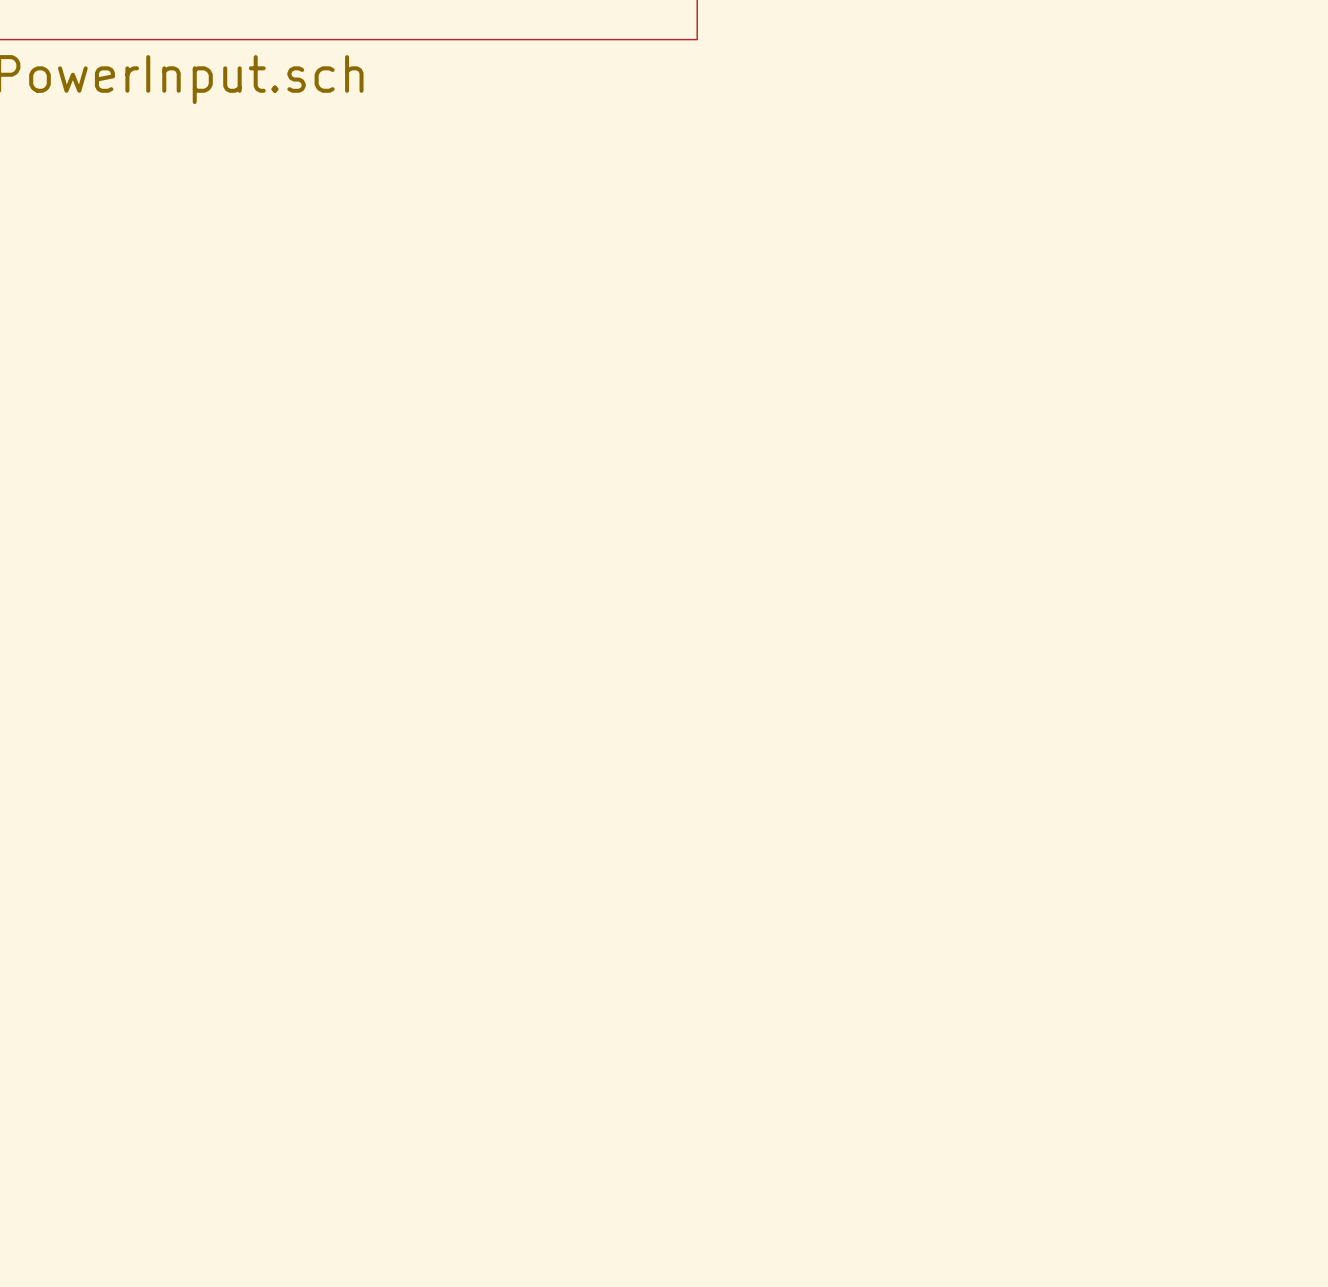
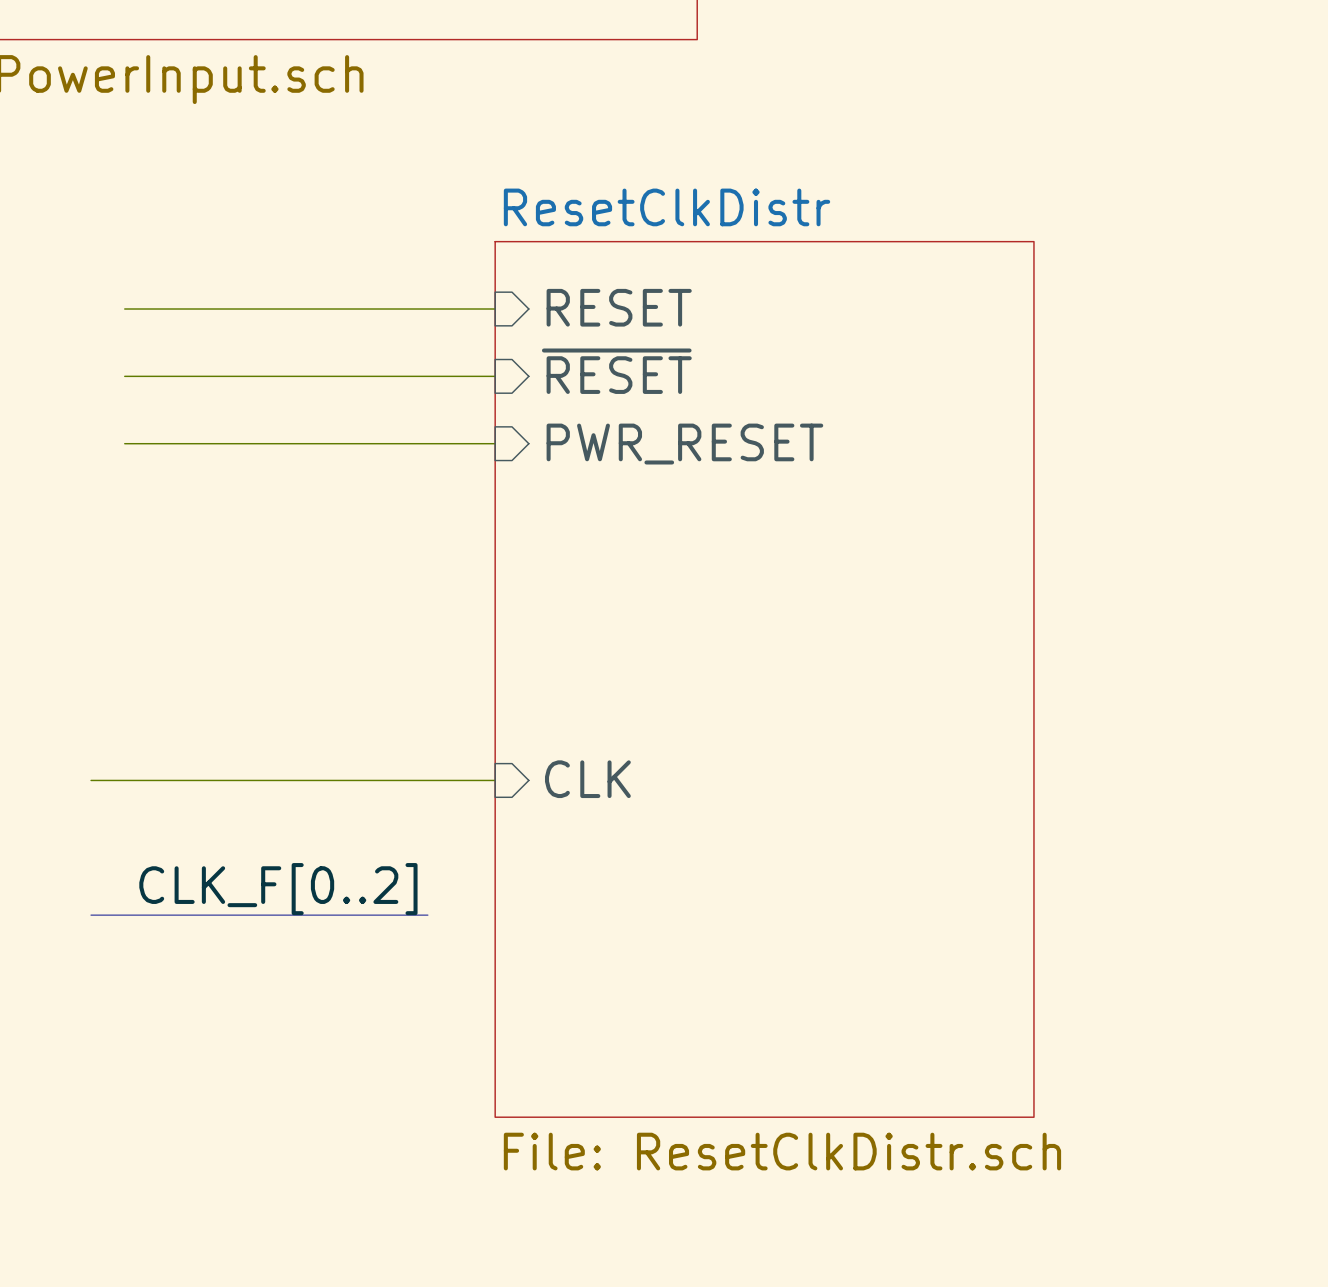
sheet pin: none -> RESET (619, 307)
wire: none -> (124, 309) (495, 309)
sheet pin: none -> ~{RESET} (616, 371)
wire: none -> (124, 376) (495, 376)
wire: none -> (124, 443) (495, 443)
sheet pin: none -> PWR_RESET (684, 444)
sheet ResetClkDistr: none -> File: ResetClkDistr.sch (764, 679)
sheet pin: none -> CLK (587, 779)
wire: none -> (91, 780) (495, 780)
label: none -> CLK_F[0..2] (278, 889)
bus: none -> (91, 915) (427, 915)

